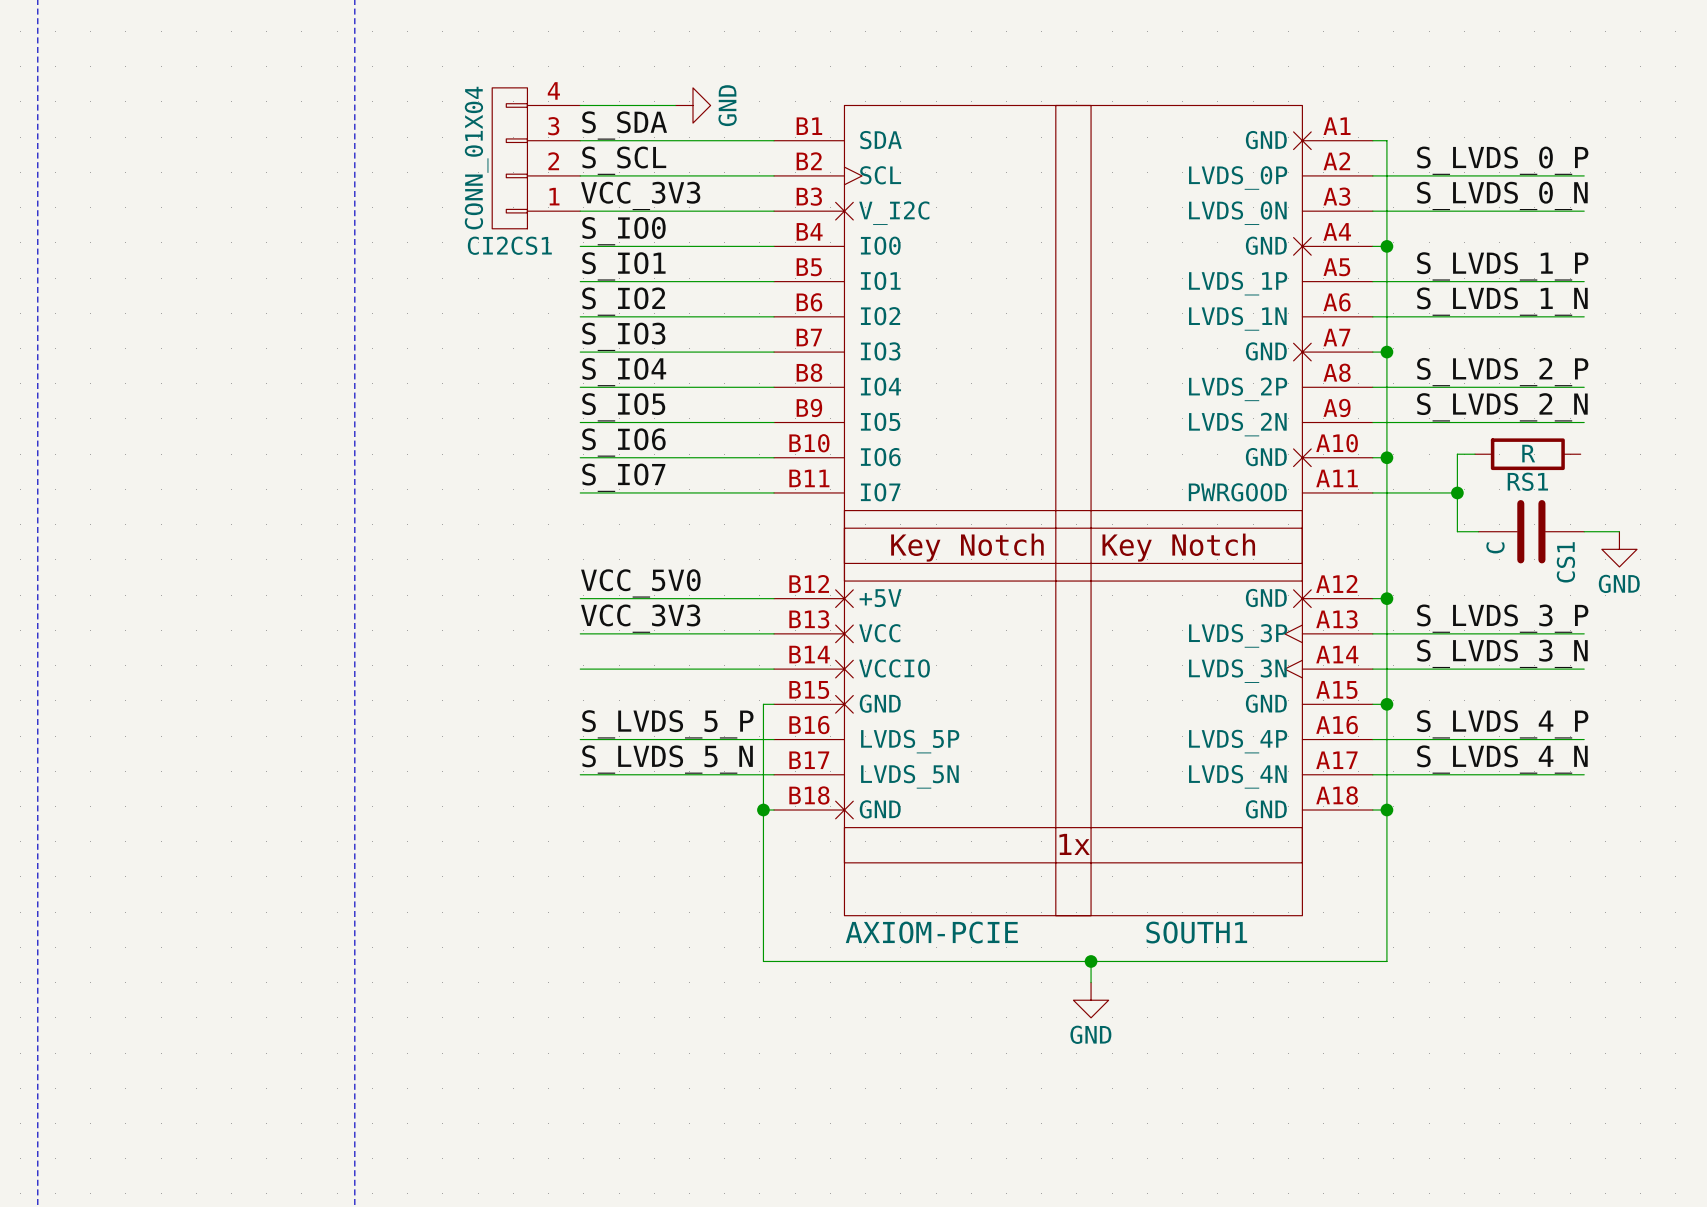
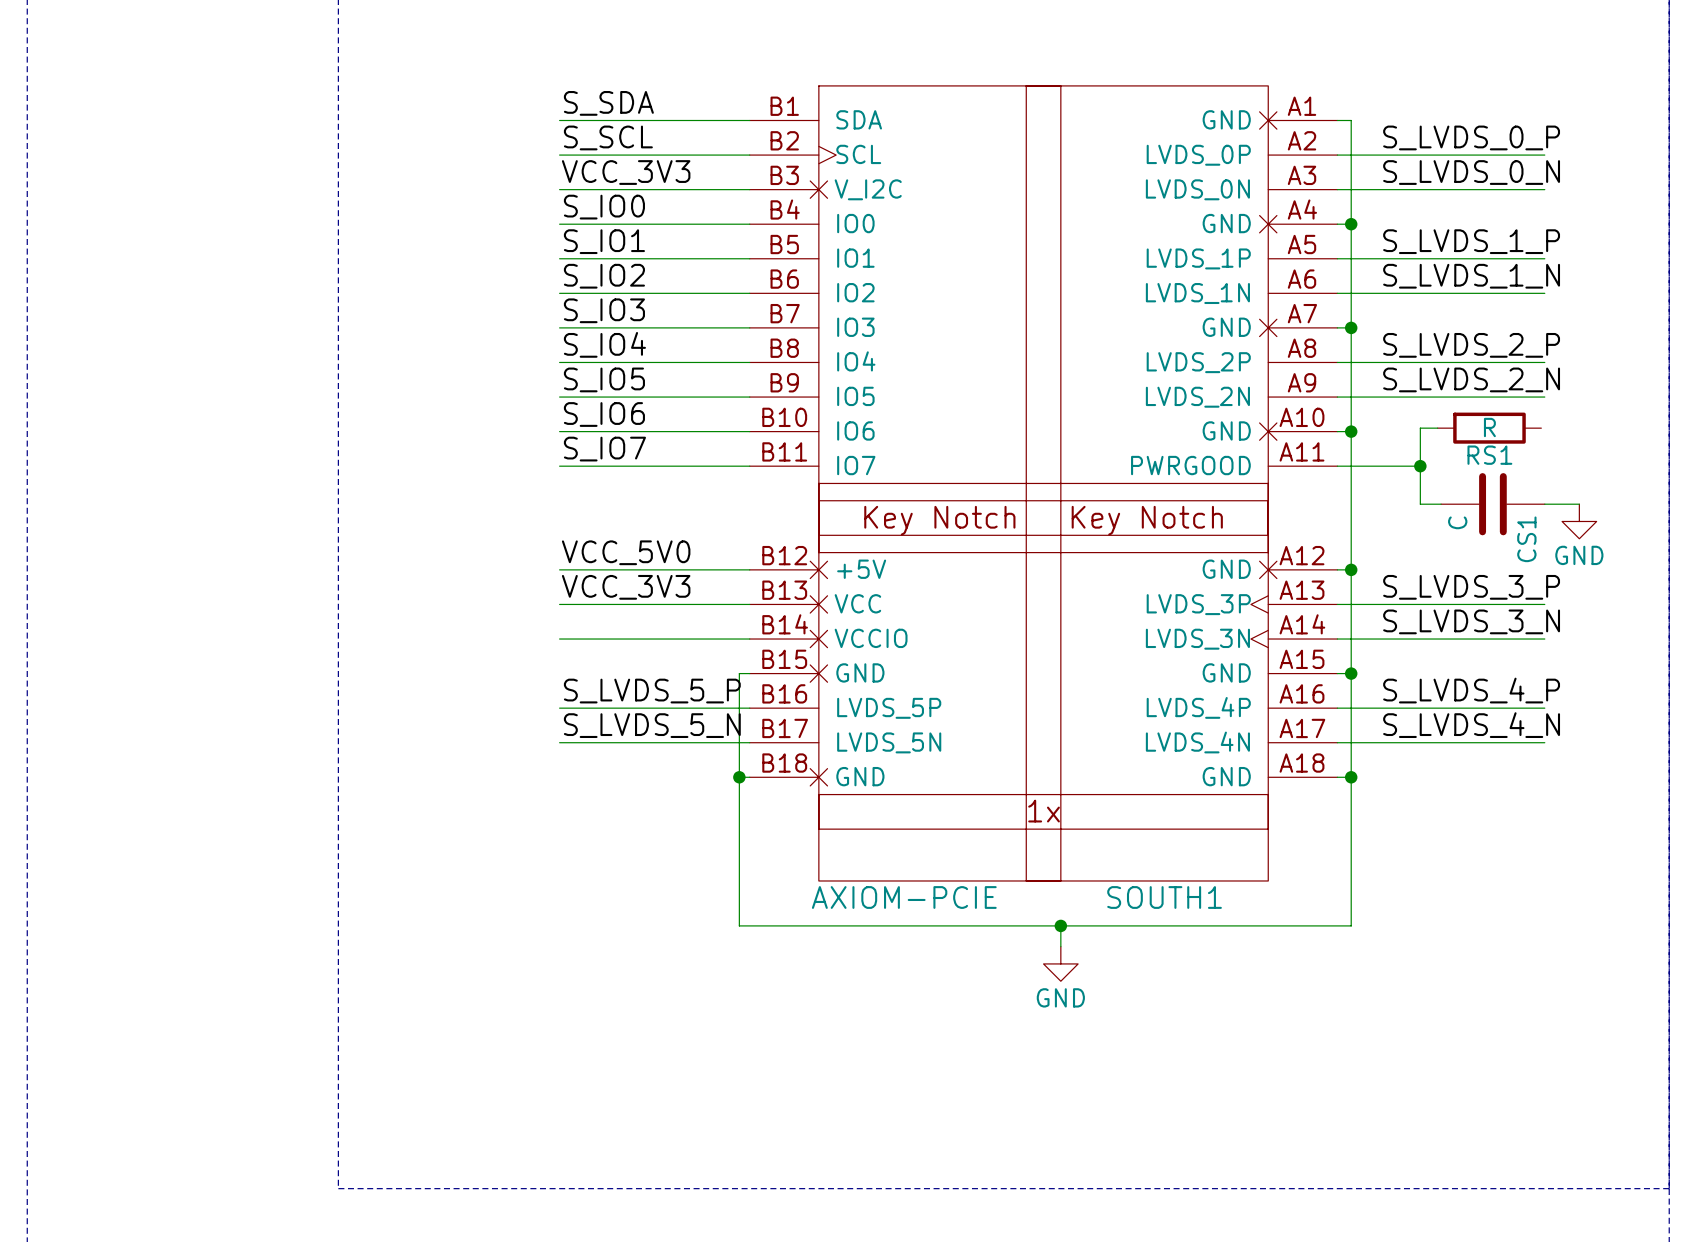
wire: (580, 105) (675, 105) -> none
power symbol: GND (692, 105) -> none
CI2CS1: CONN_01X04 (536, 158) -> none

